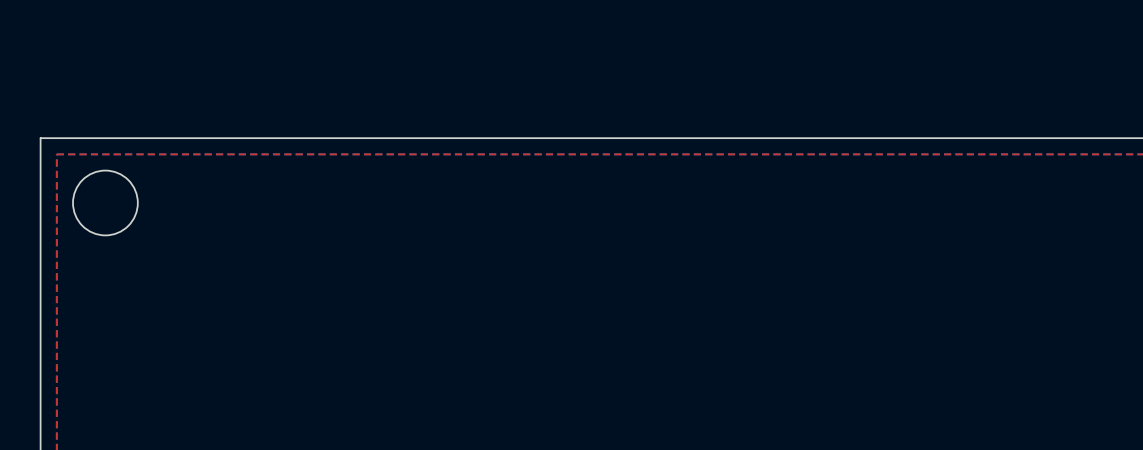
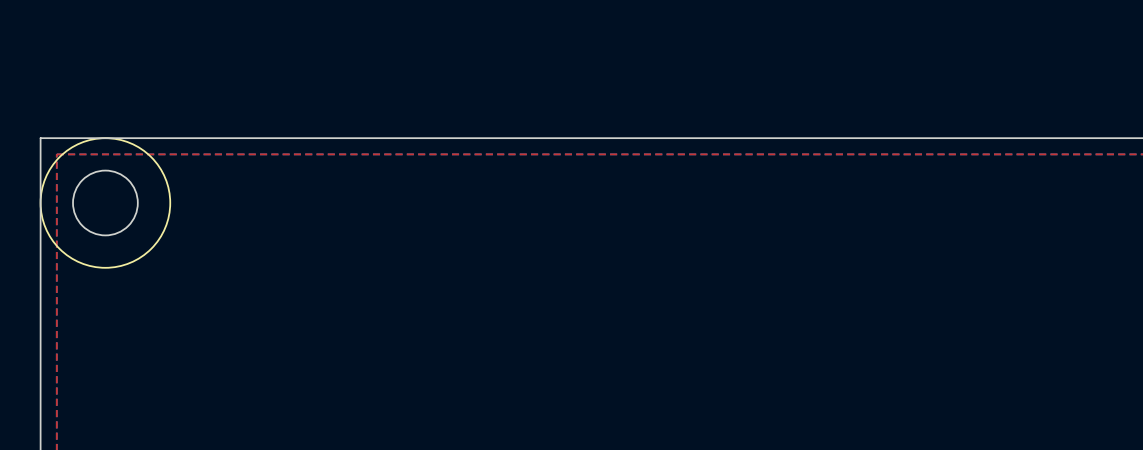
drawing: none -> [39, 137, 172, 269]

